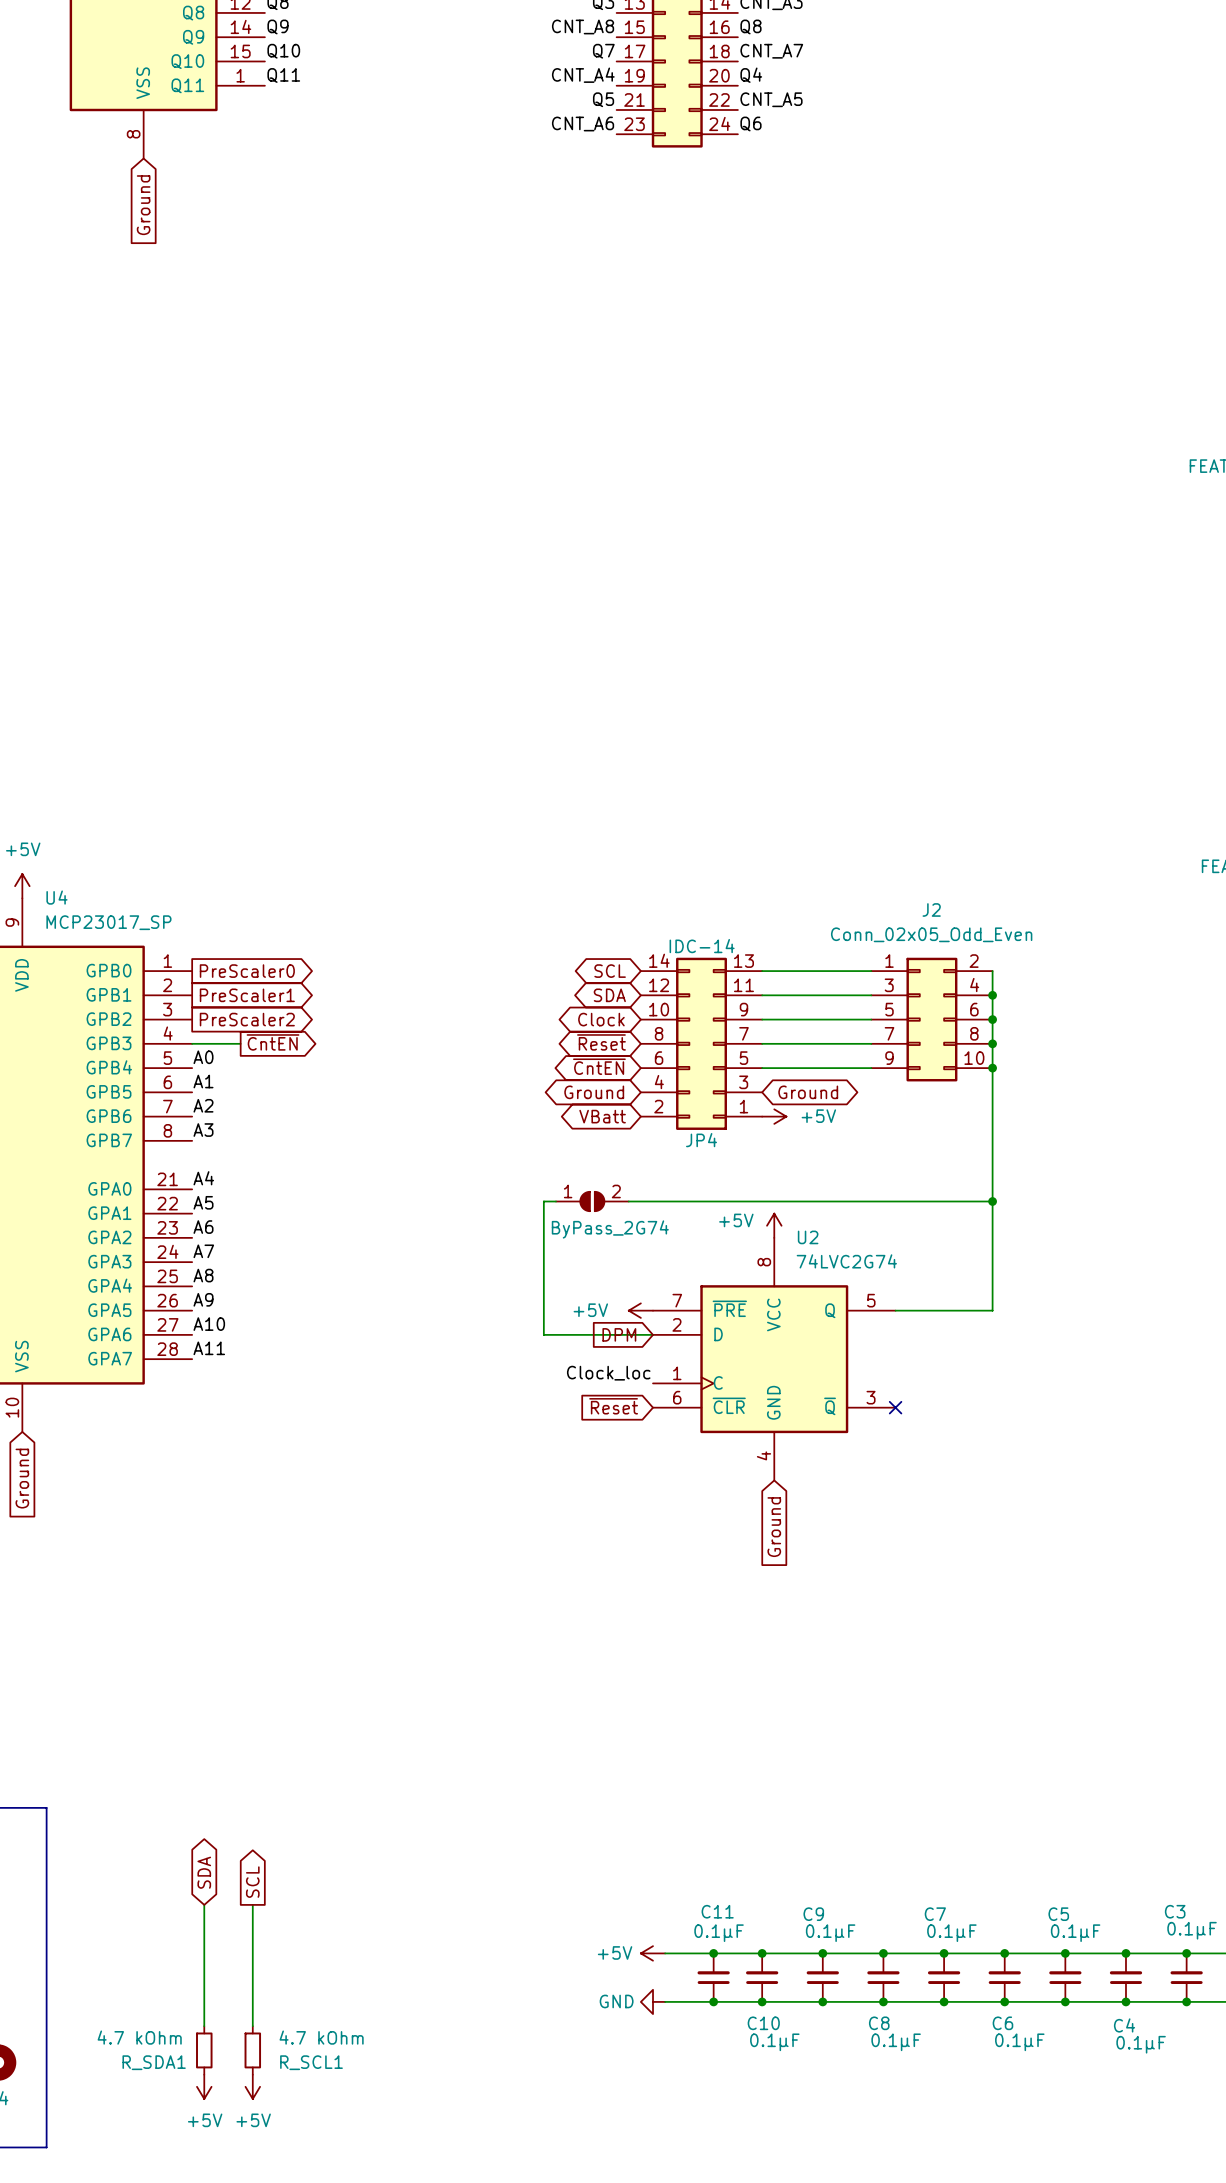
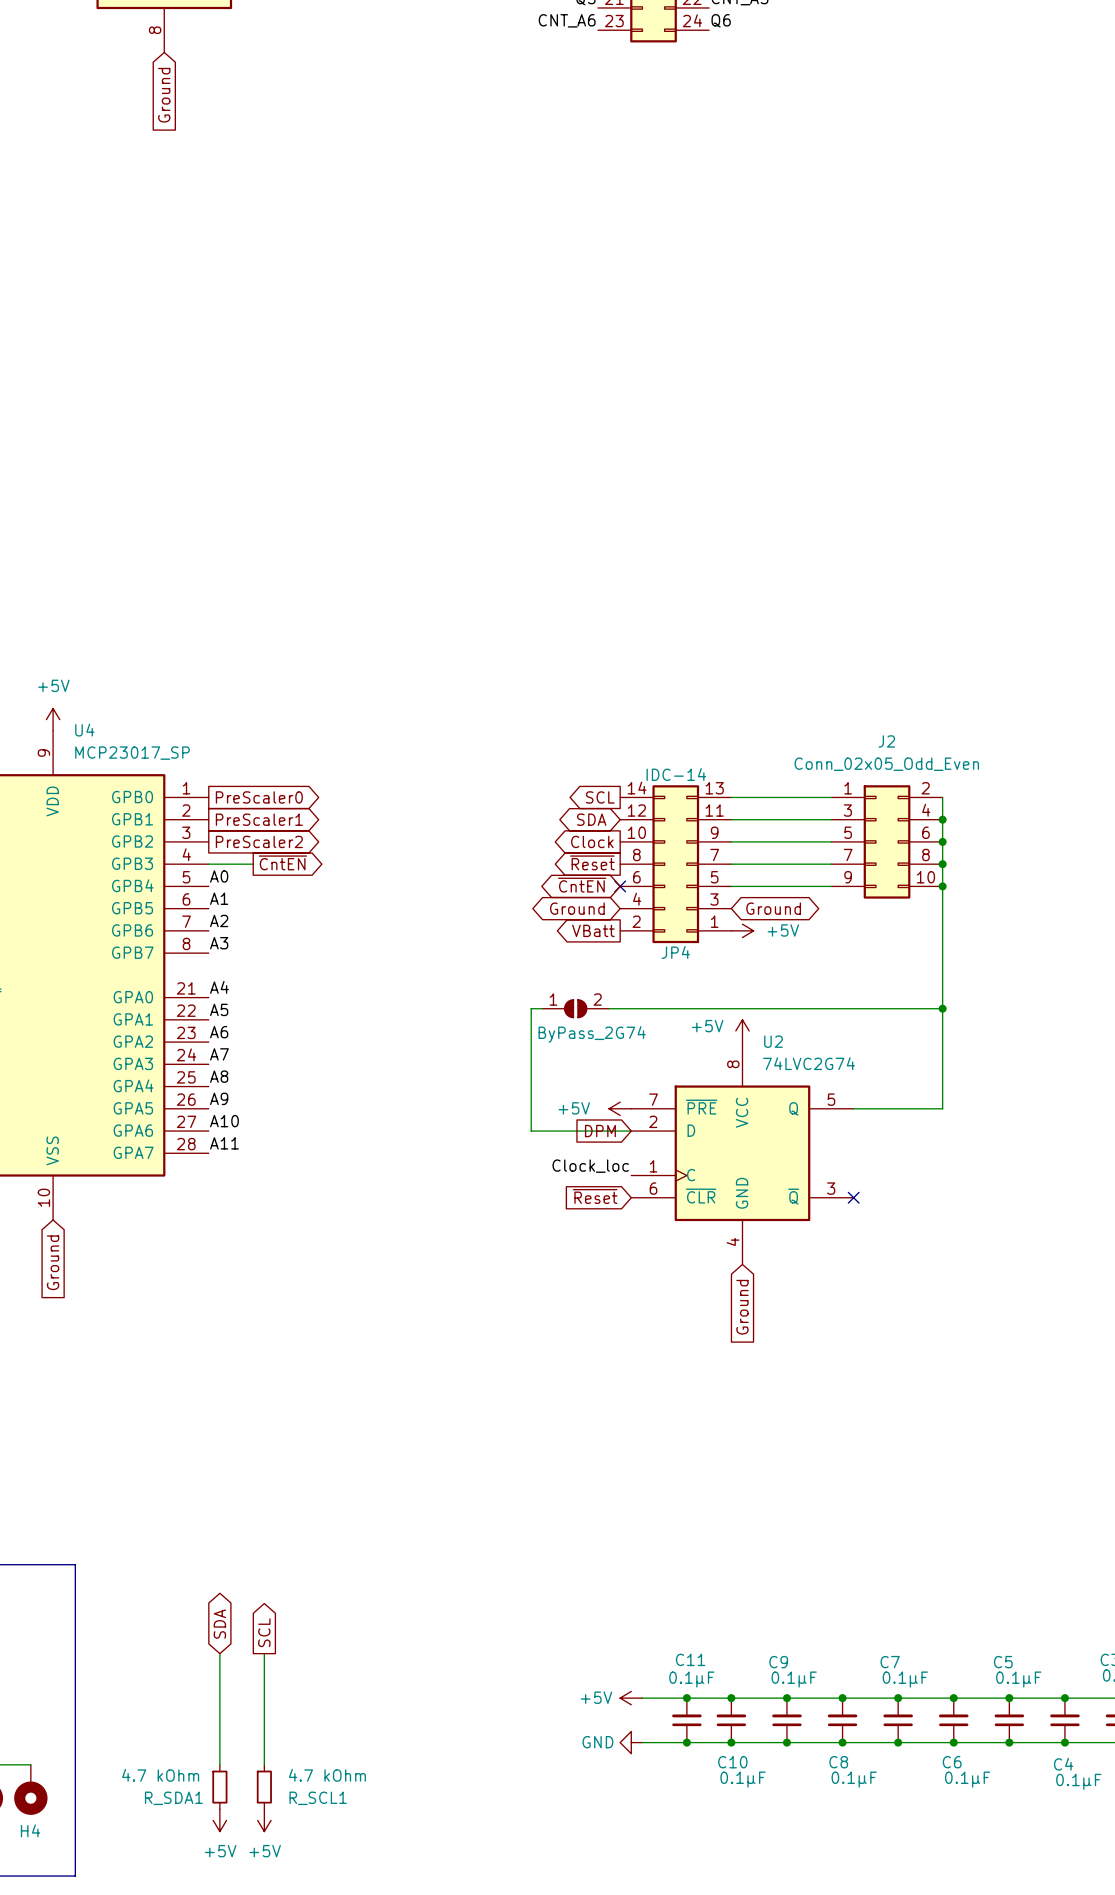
global label shape: bidirectional (610, 971) -> output (600, 797)
global label shape: bidirectional (601, 1019) -> output (592, 841)
global label shape: bidirectional (601, 1042) -> output (592, 862)
no-connect mark: none -> (620, 886)
global label shape: bidirectional (602, 1116) -> output (593, 930)

